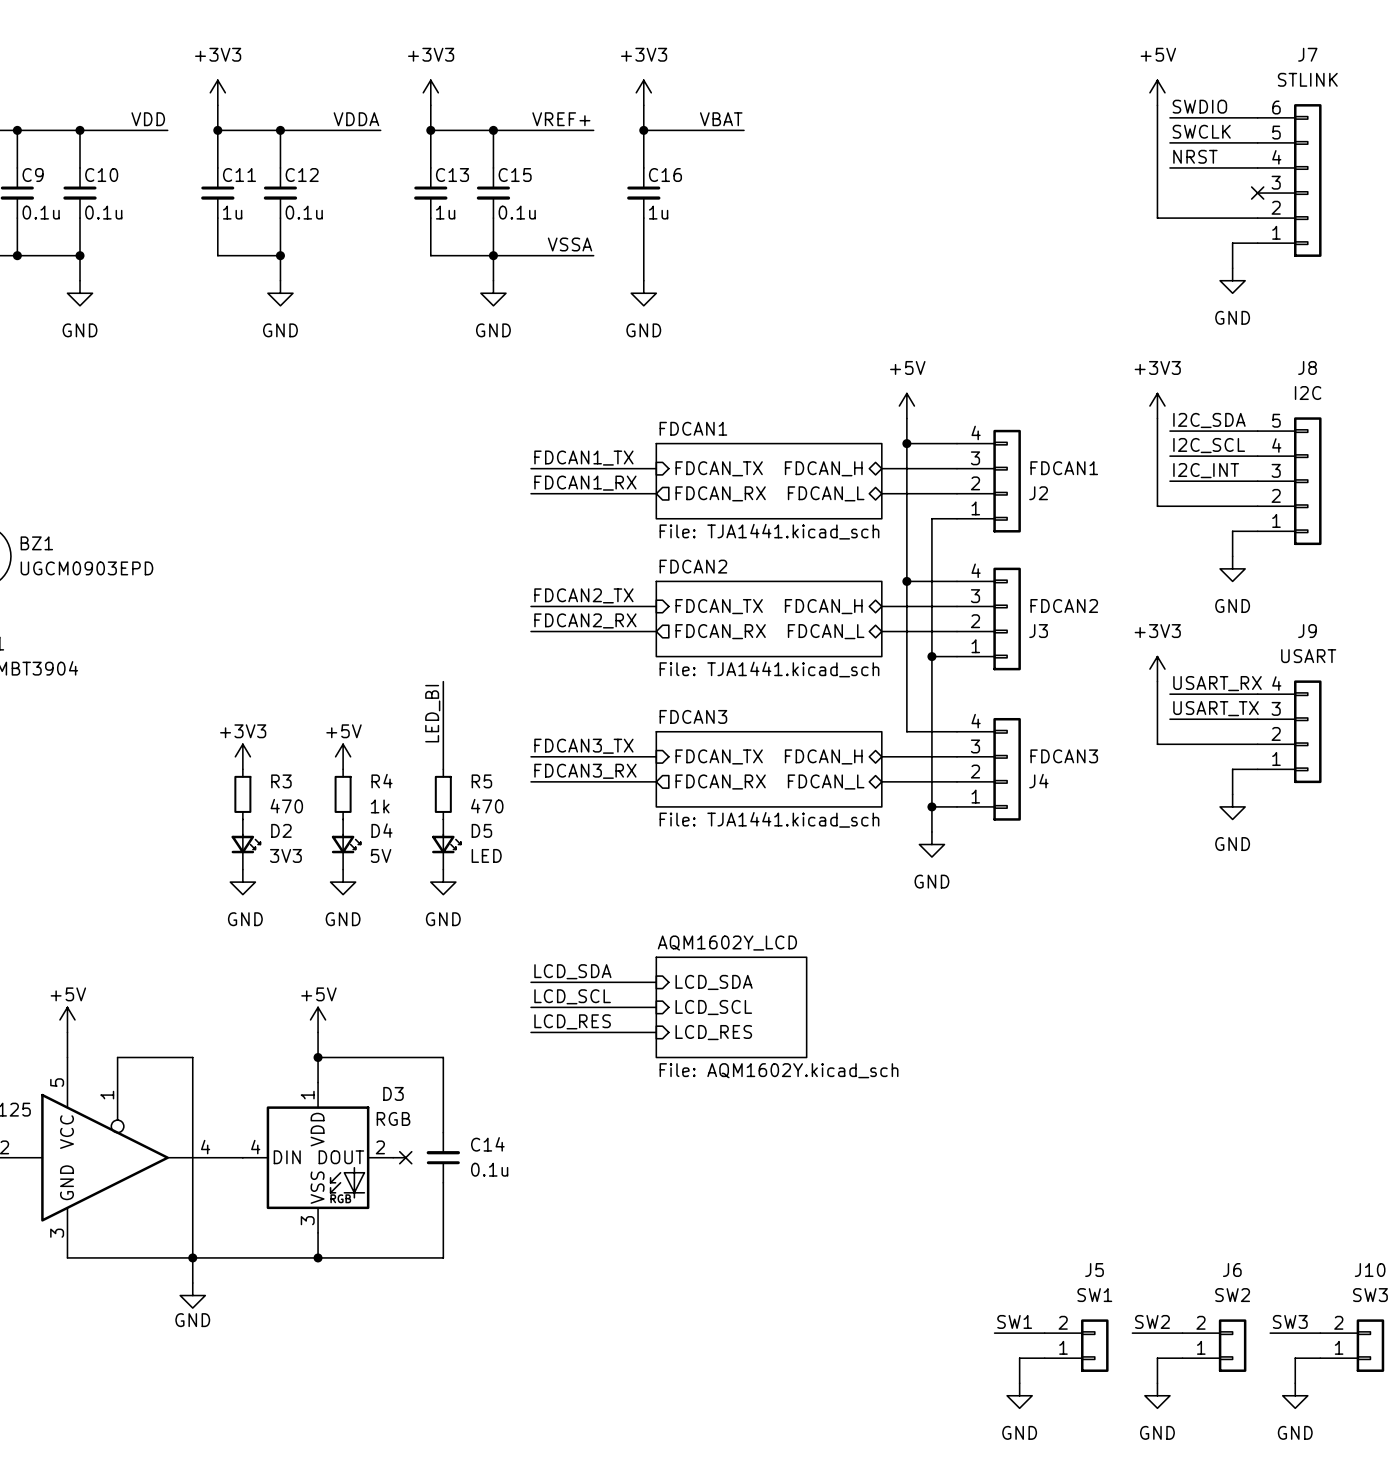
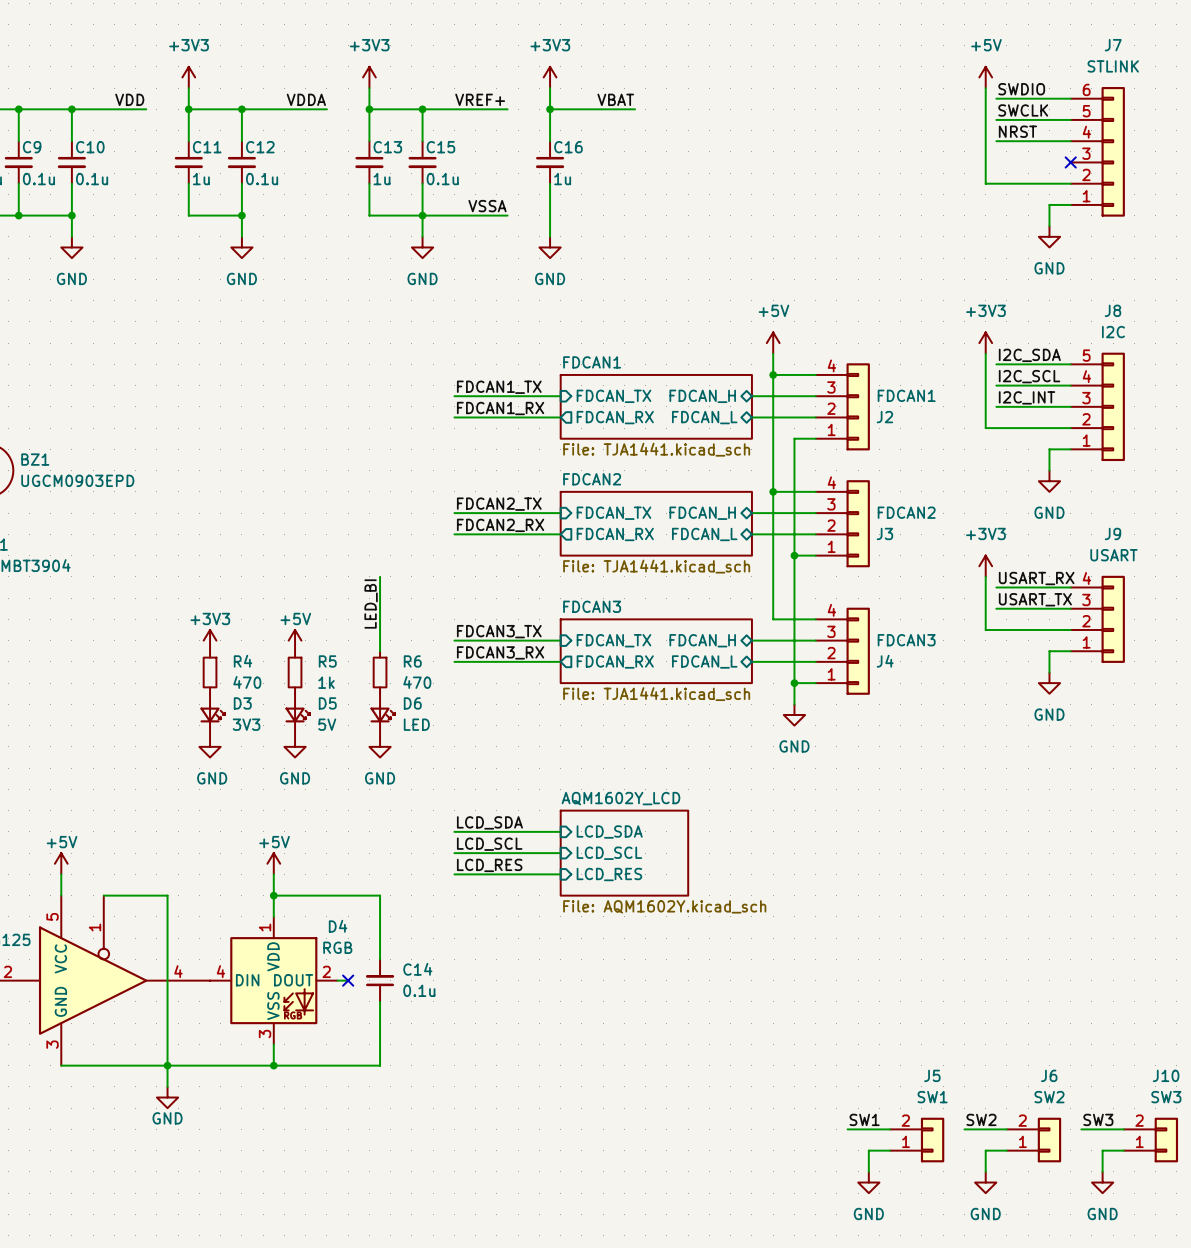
R3 name: R3 (281, 781) -> R4 (243, 661)
R4 name: R4 (381, 781) -> R5 (327, 661)
R5 name: R5 (481, 781) -> R6 (412, 661)
D2 name: D2 (281, 830) -> D3 (242, 703)
D4 name: D4 (381, 830) -> D5 (327, 703)
D5 name: D5 (481, 830) -> D6 (412, 703)
D3 name: D3 (393, 1093) -> D4 (338, 926)

